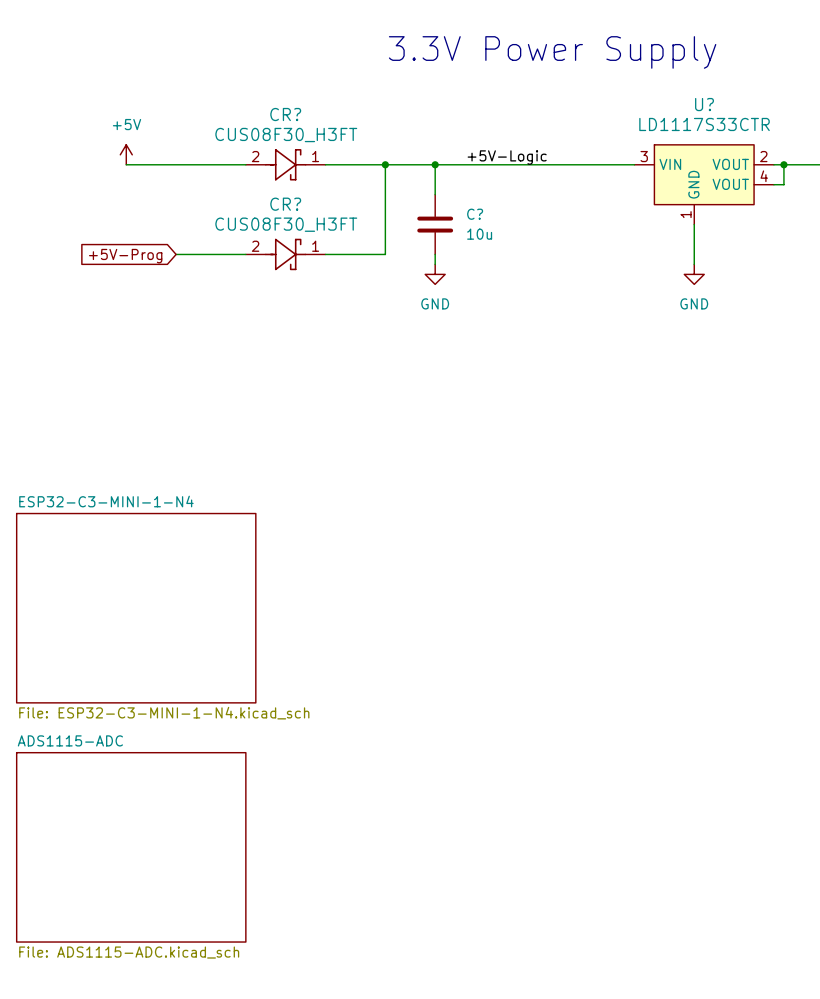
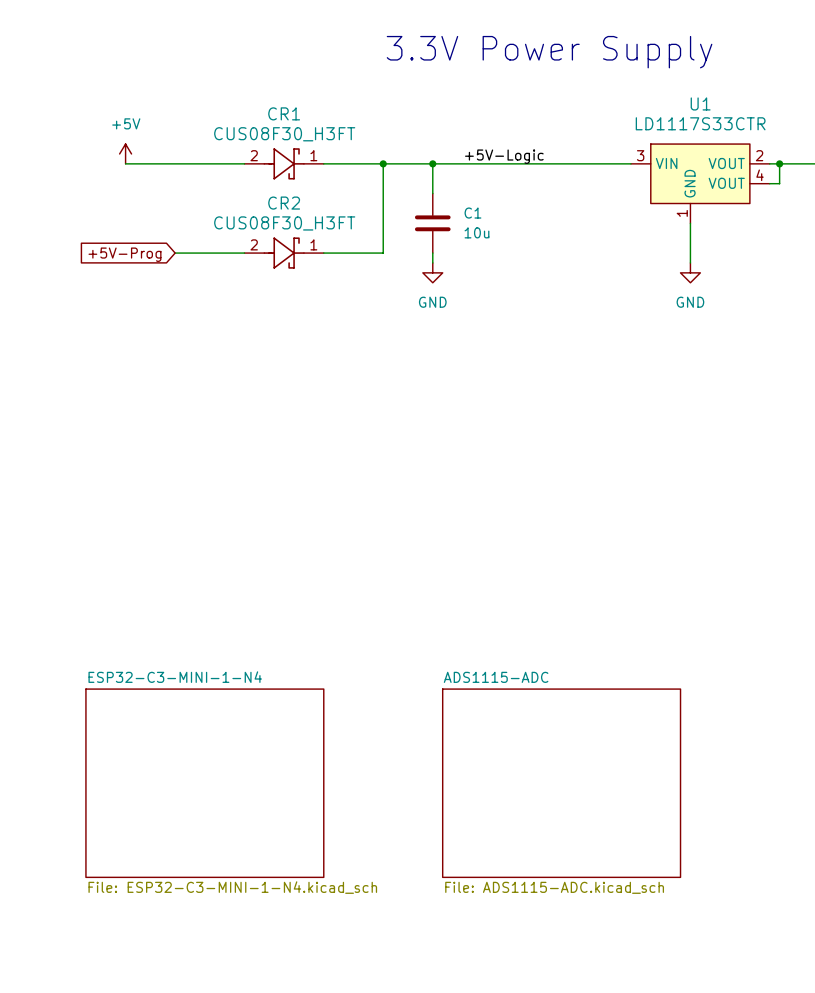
U? name: U? (704, 104) -> U1 (700, 103)
CR? name: CR? (285, 114) -> CR1 (284, 113)
CR? name: CR? (285, 204) -> CR2 (284, 203)
C? name: C? (475, 214) -> C1 (472, 213)
sheet ESP32-C3-MINI-1-N4 position: (136, 608) -> (204, 783)
sheet ADS1115-ADC shape: [16, 752, 247, 943] -> [442, 688, 682, 878]

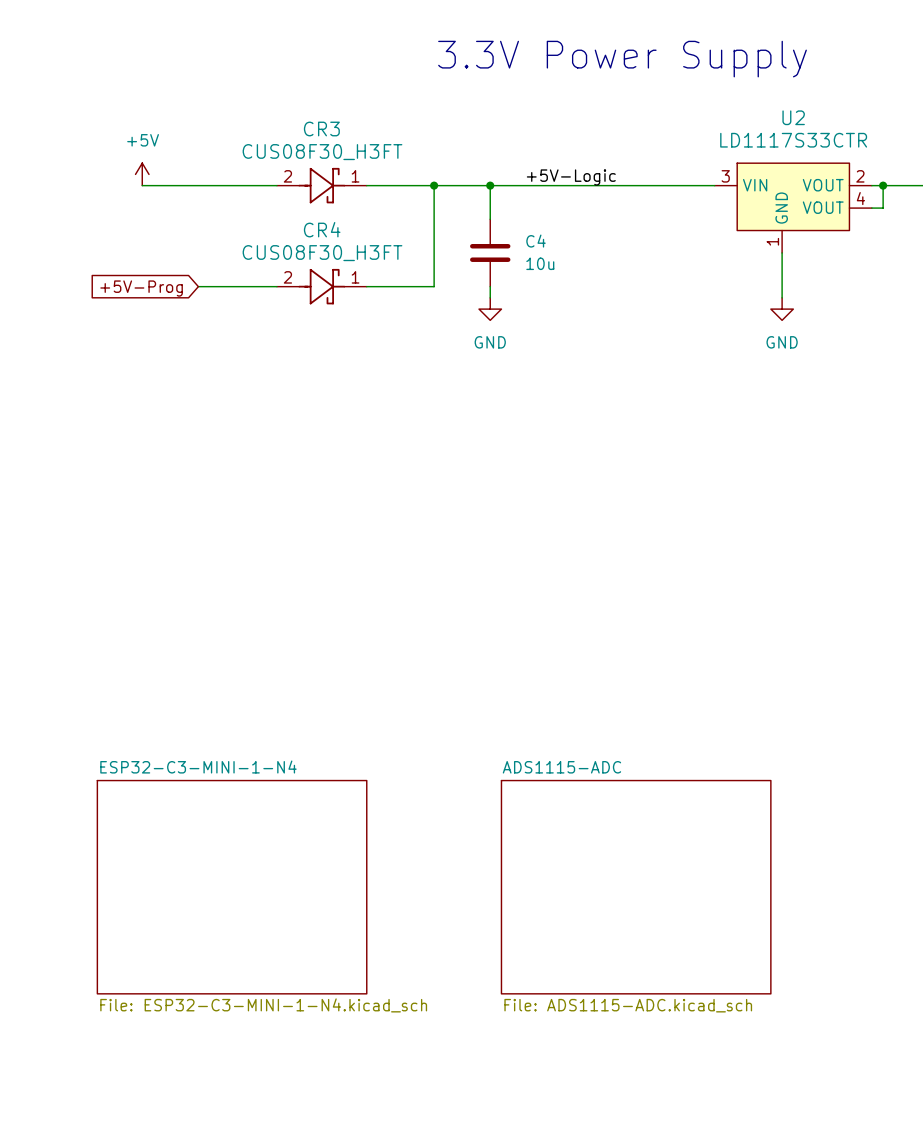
U1 name: U1 (700, 103) -> U2 (793, 117)
CR1 name: CR1 (284, 113) -> CR3 (321, 129)
CR2 name: CR2 (284, 203) -> CR4 (322, 229)
C1 name: C1 (472, 213) -> C4 (536, 241)

